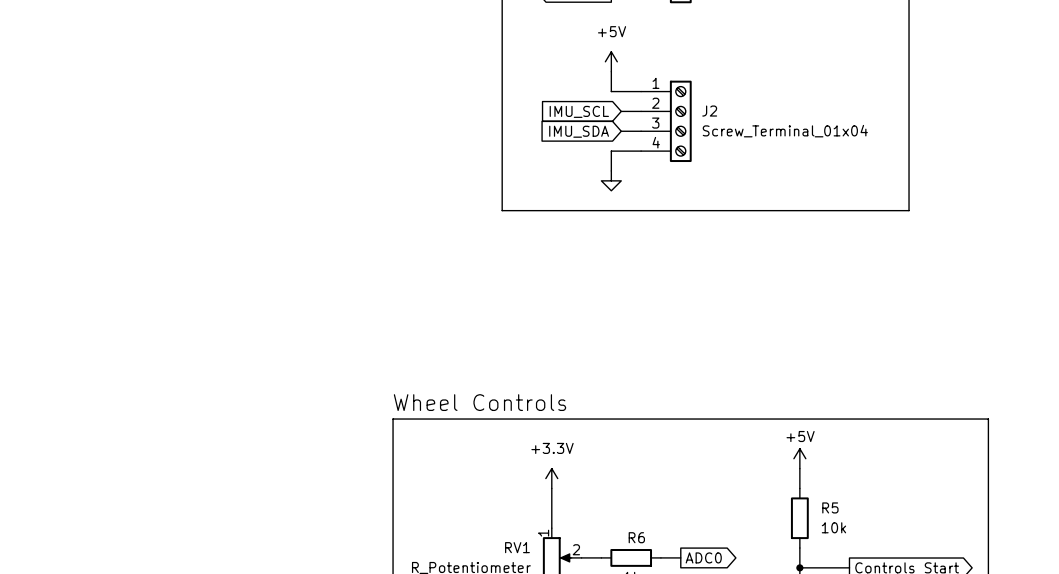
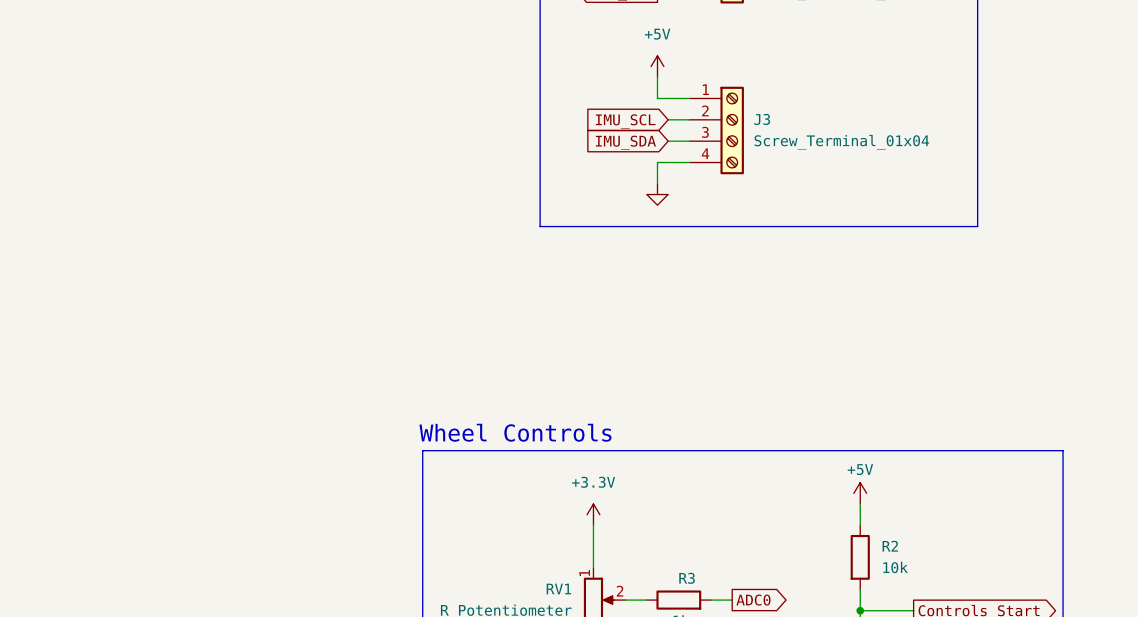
J2 name: J2 (709, 111) -> J3 (762, 119)
R5 name: R5 (830, 507) -> R2 (890, 546)
R6 name: R6 (636, 537) -> R3 (687, 578)

